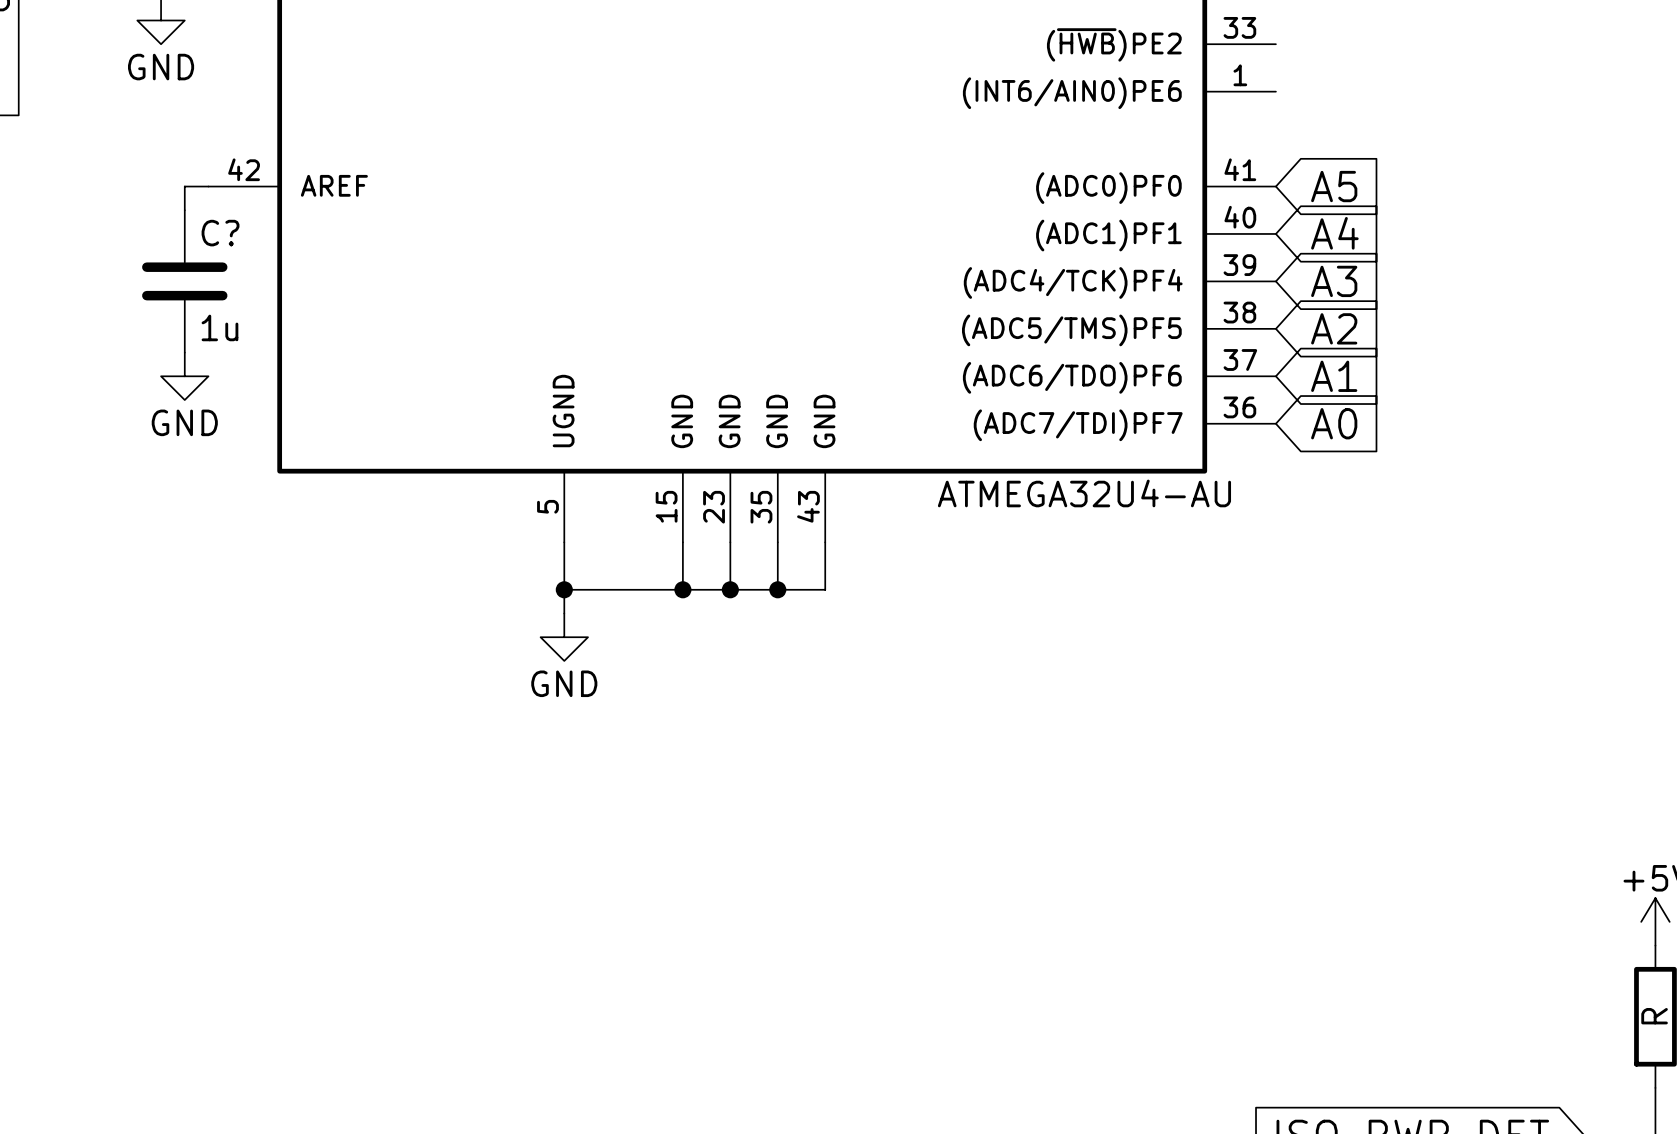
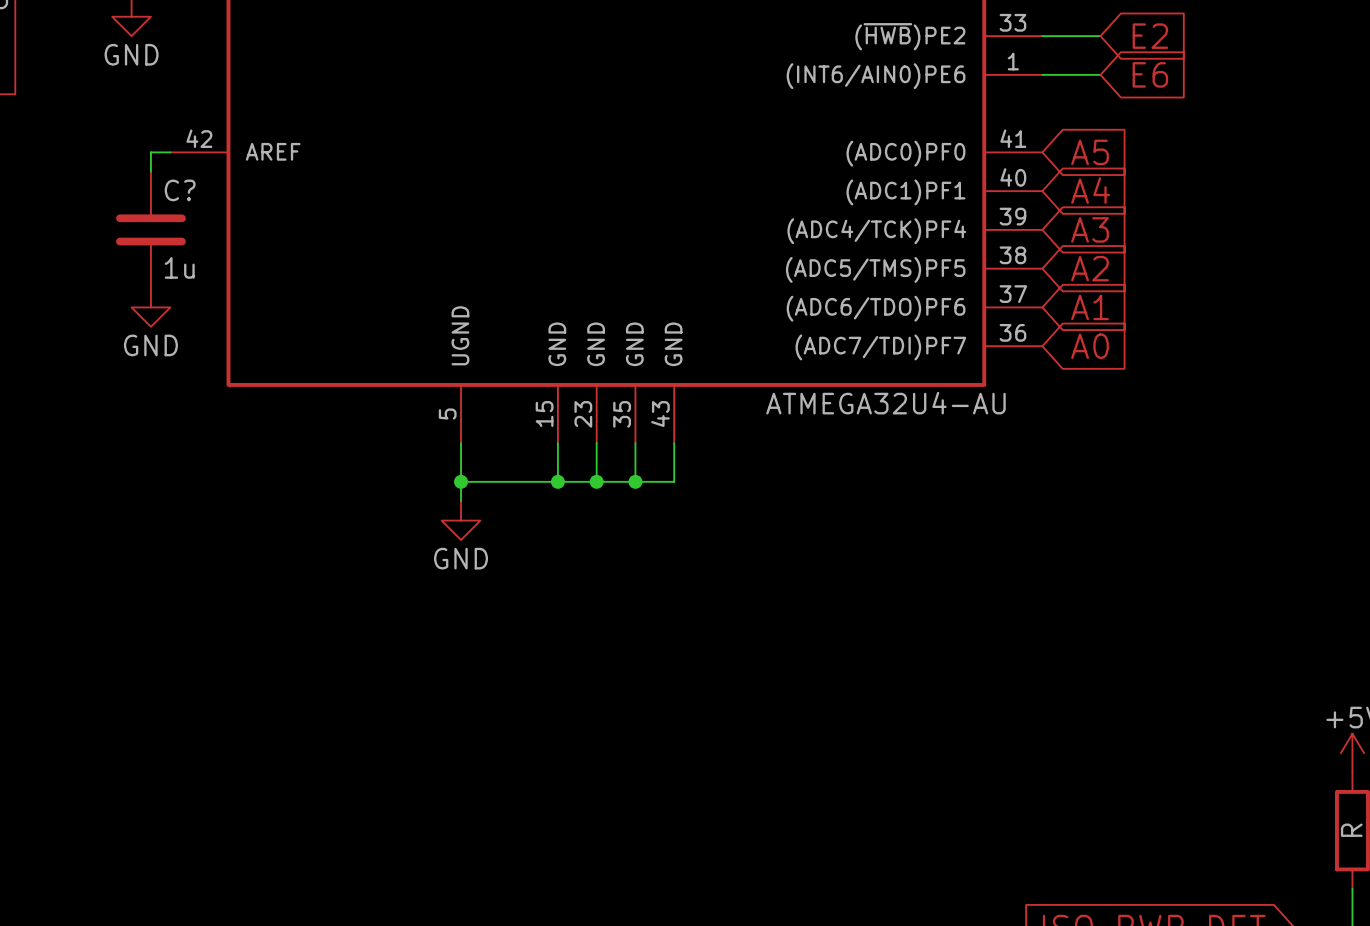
wire: none -> (1042, 36) (1100, 36)
global label: none -> E2 (1150, 36)
wire: none -> (1042, 74) (1100, 74)
global label: none -> E6 (1150, 74)

